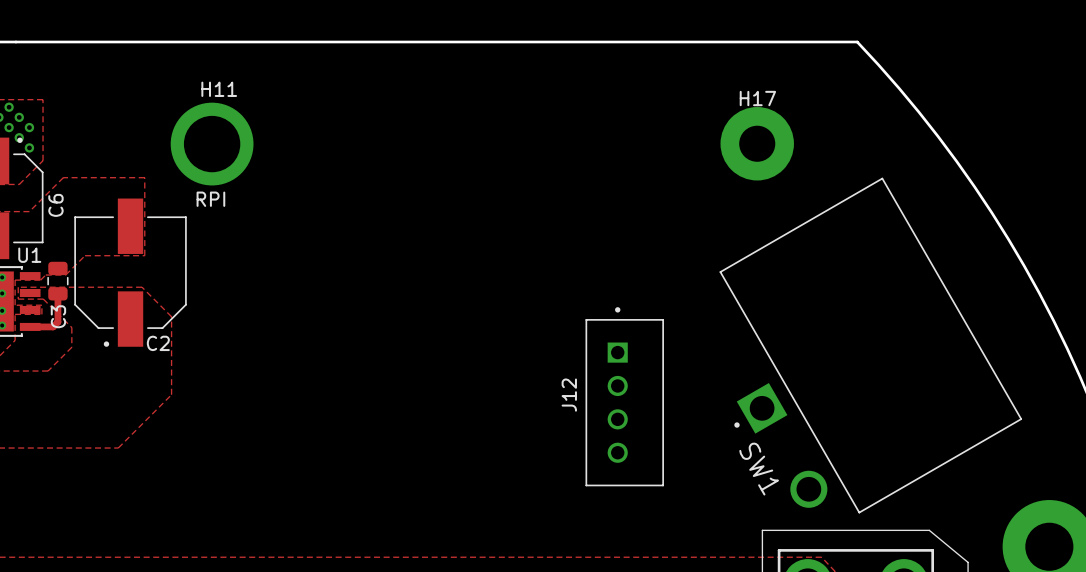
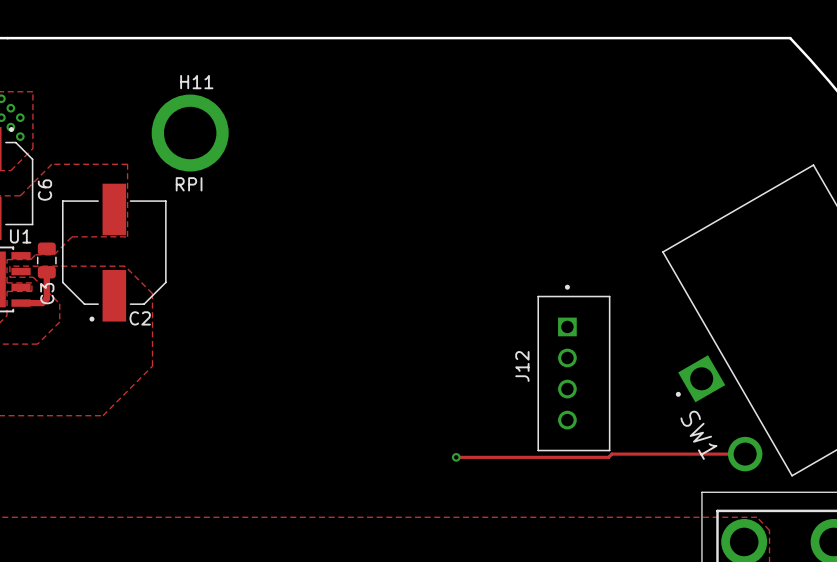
H17: (757, 143) -> none
track: none -> (745, 454) (611, 454) (608, 457) (456, 457)
via: none -> (456, 457)

